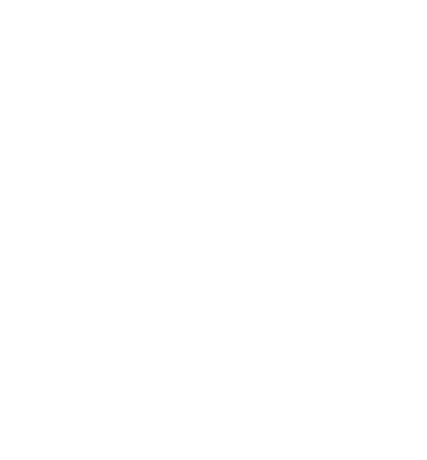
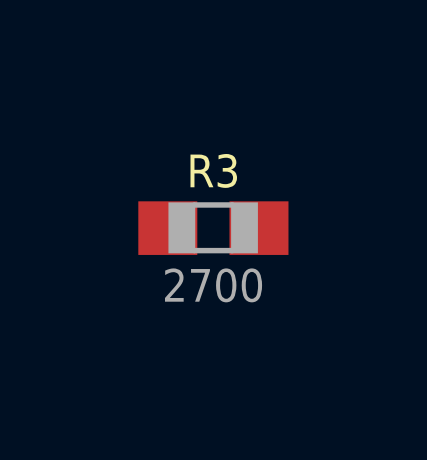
R3: none -> 2700 (213, 228)

